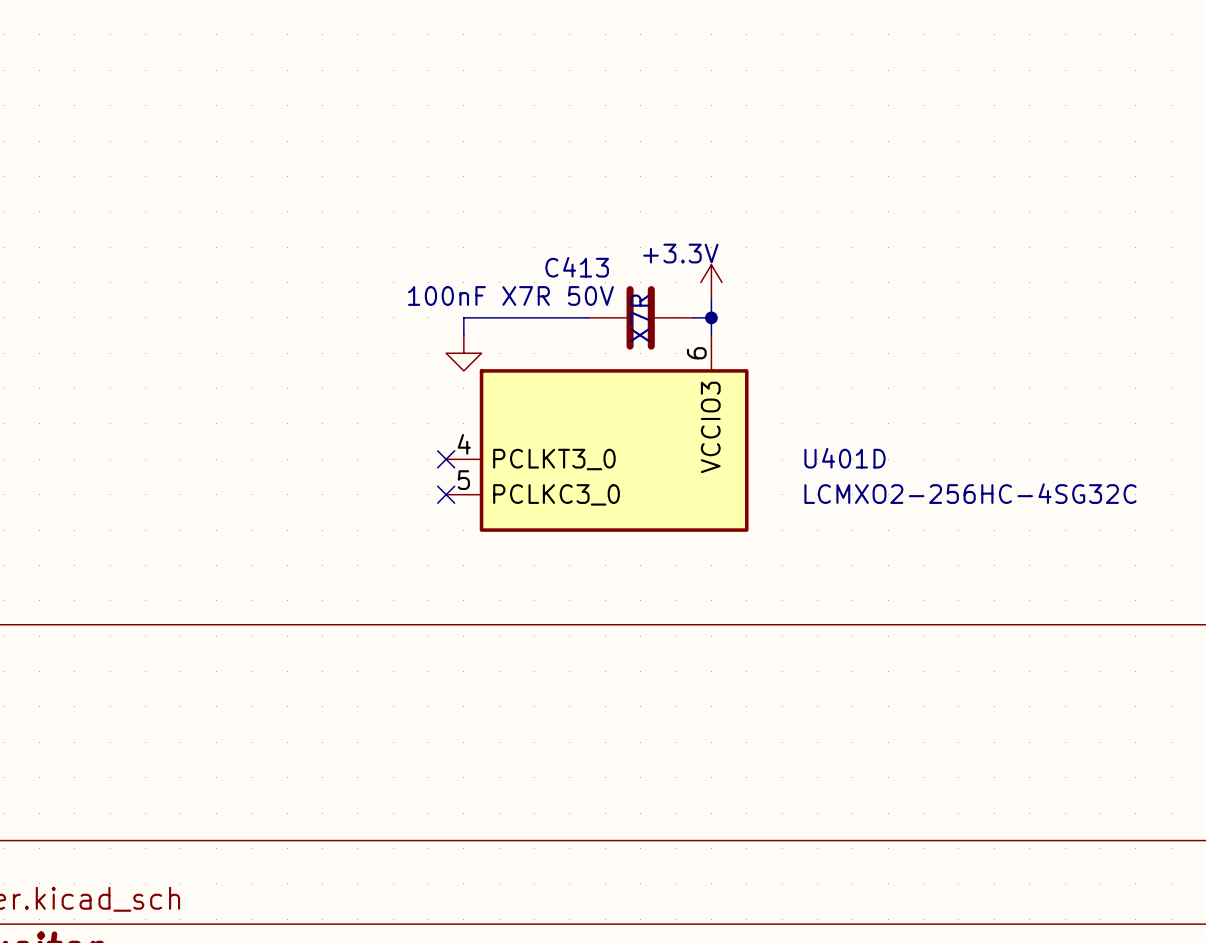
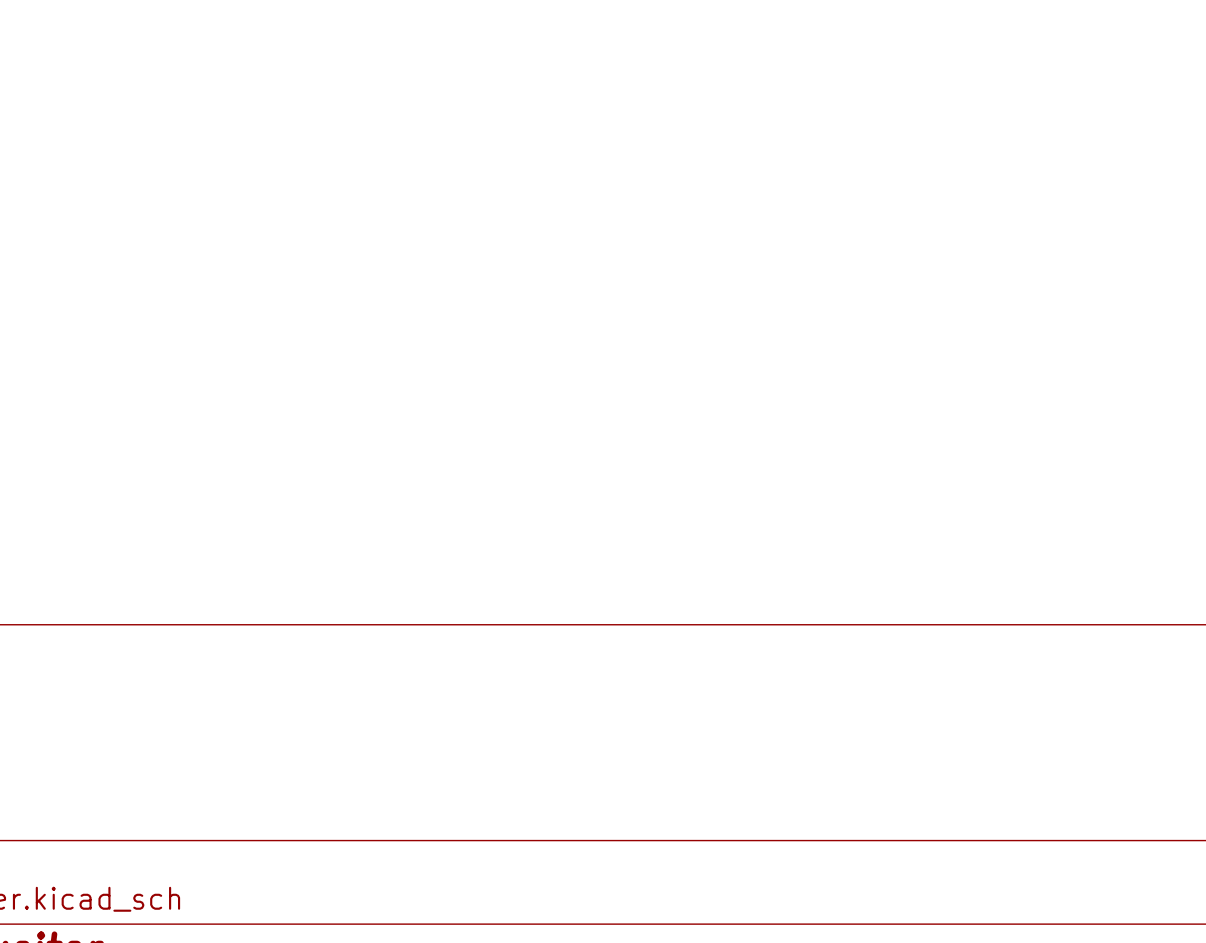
power symbol: +3.3V (711, 282) -> none
wire: (711, 300) (711, 335) -> none
wire: (587, 317) (463, 317) (463, 335) -> none
C413: 100nF X7R 50V (640, 317) -> none
wire: (693, 317) (711, 317) -> none
junction: (711, 317) -> none
power symbol: (463, 353) -> none
U401D: LCMXO2-256HC-4SG32C (597, 433) -> none
no-connect mark: (446, 459) -> none
no-connect mark: (446, 494) -> none

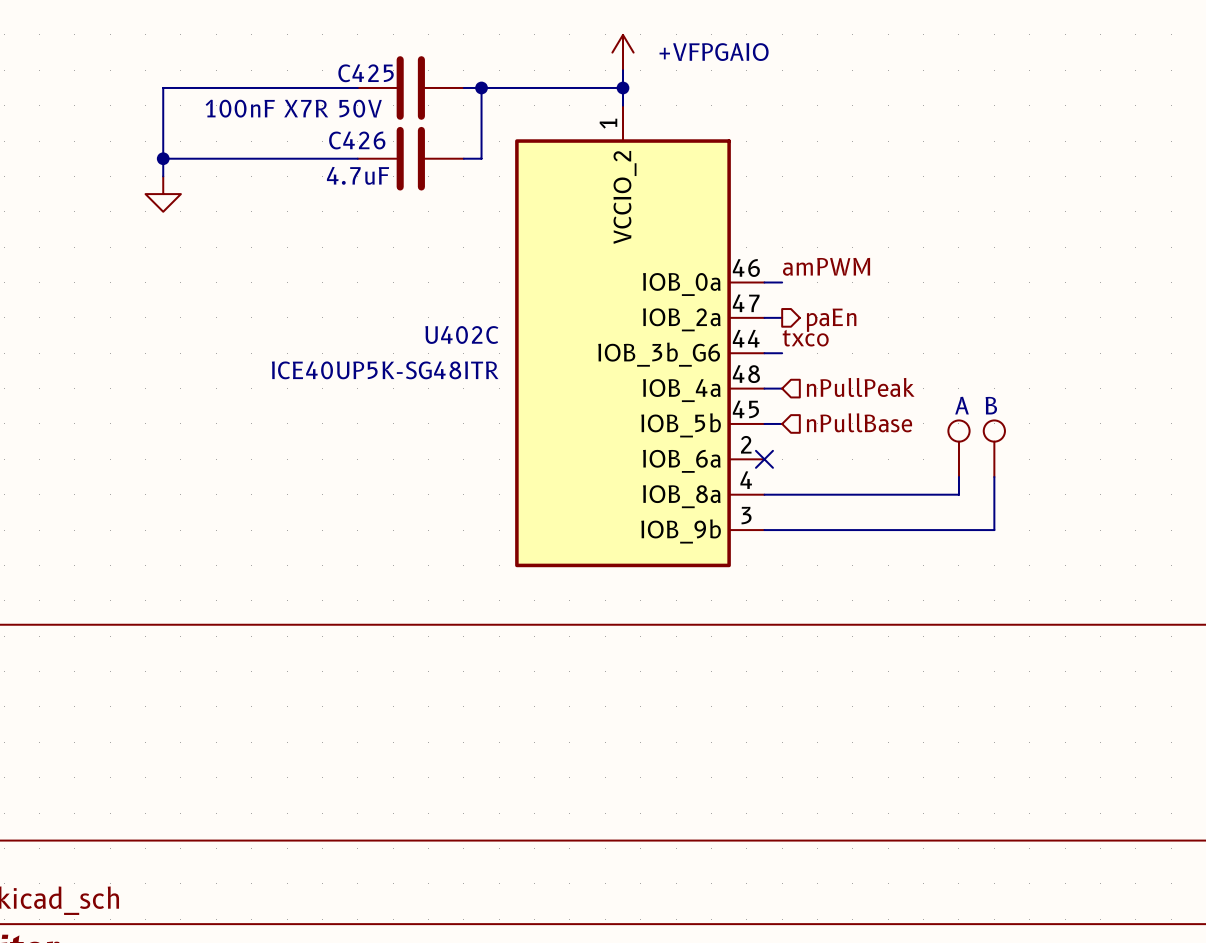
power symbol: none -> +VFPGAIO (623, 52)
wire: none -> (623, 70) (623, 105)
wire: none -> (357, 87) (163, 87) (163, 176)
C425: none -> 100nF X7R 50V (410, 87)
wire: none -> (463, 87) (623, 87)
wire: none -> (481, 87) (481, 158) (463, 158)
junction: none -> (481, 87)
junction: none -> (623, 87)
wire: none -> (163, 158) (357, 158)
junction: none -> (163, 158)
C426: none -> 4.7uF (410, 158)
power symbol: none -> (163, 194)
label: none -> amPWM (826, 266)
wire: none -> (764, 282) (782, 282)
wire: none -> (764, 317) (782, 317)
hierarchical label: none -> paEn (831, 320)
U402C: none -> ICE40UP5K-SG48ITR (639, 336)
label: none -> txco (805, 338)
wire: none -> (764, 353) (782, 353)
hierarchical label: none -> nPullPeak (860, 387)
wire: none -> (764, 388) (782, 388)
wire: none -> (764, 423) (782, 423)
hierarchical label: none -> nPullBase (859, 422)
part: none -> A (958, 448)
part: none -> B (994, 448)
no-connect mark: none -> (764, 459)
wire: none -> (958, 477) (958, 494) (764, 494)
wire: none -> (994, 477) (994, 530) (764, 530)

